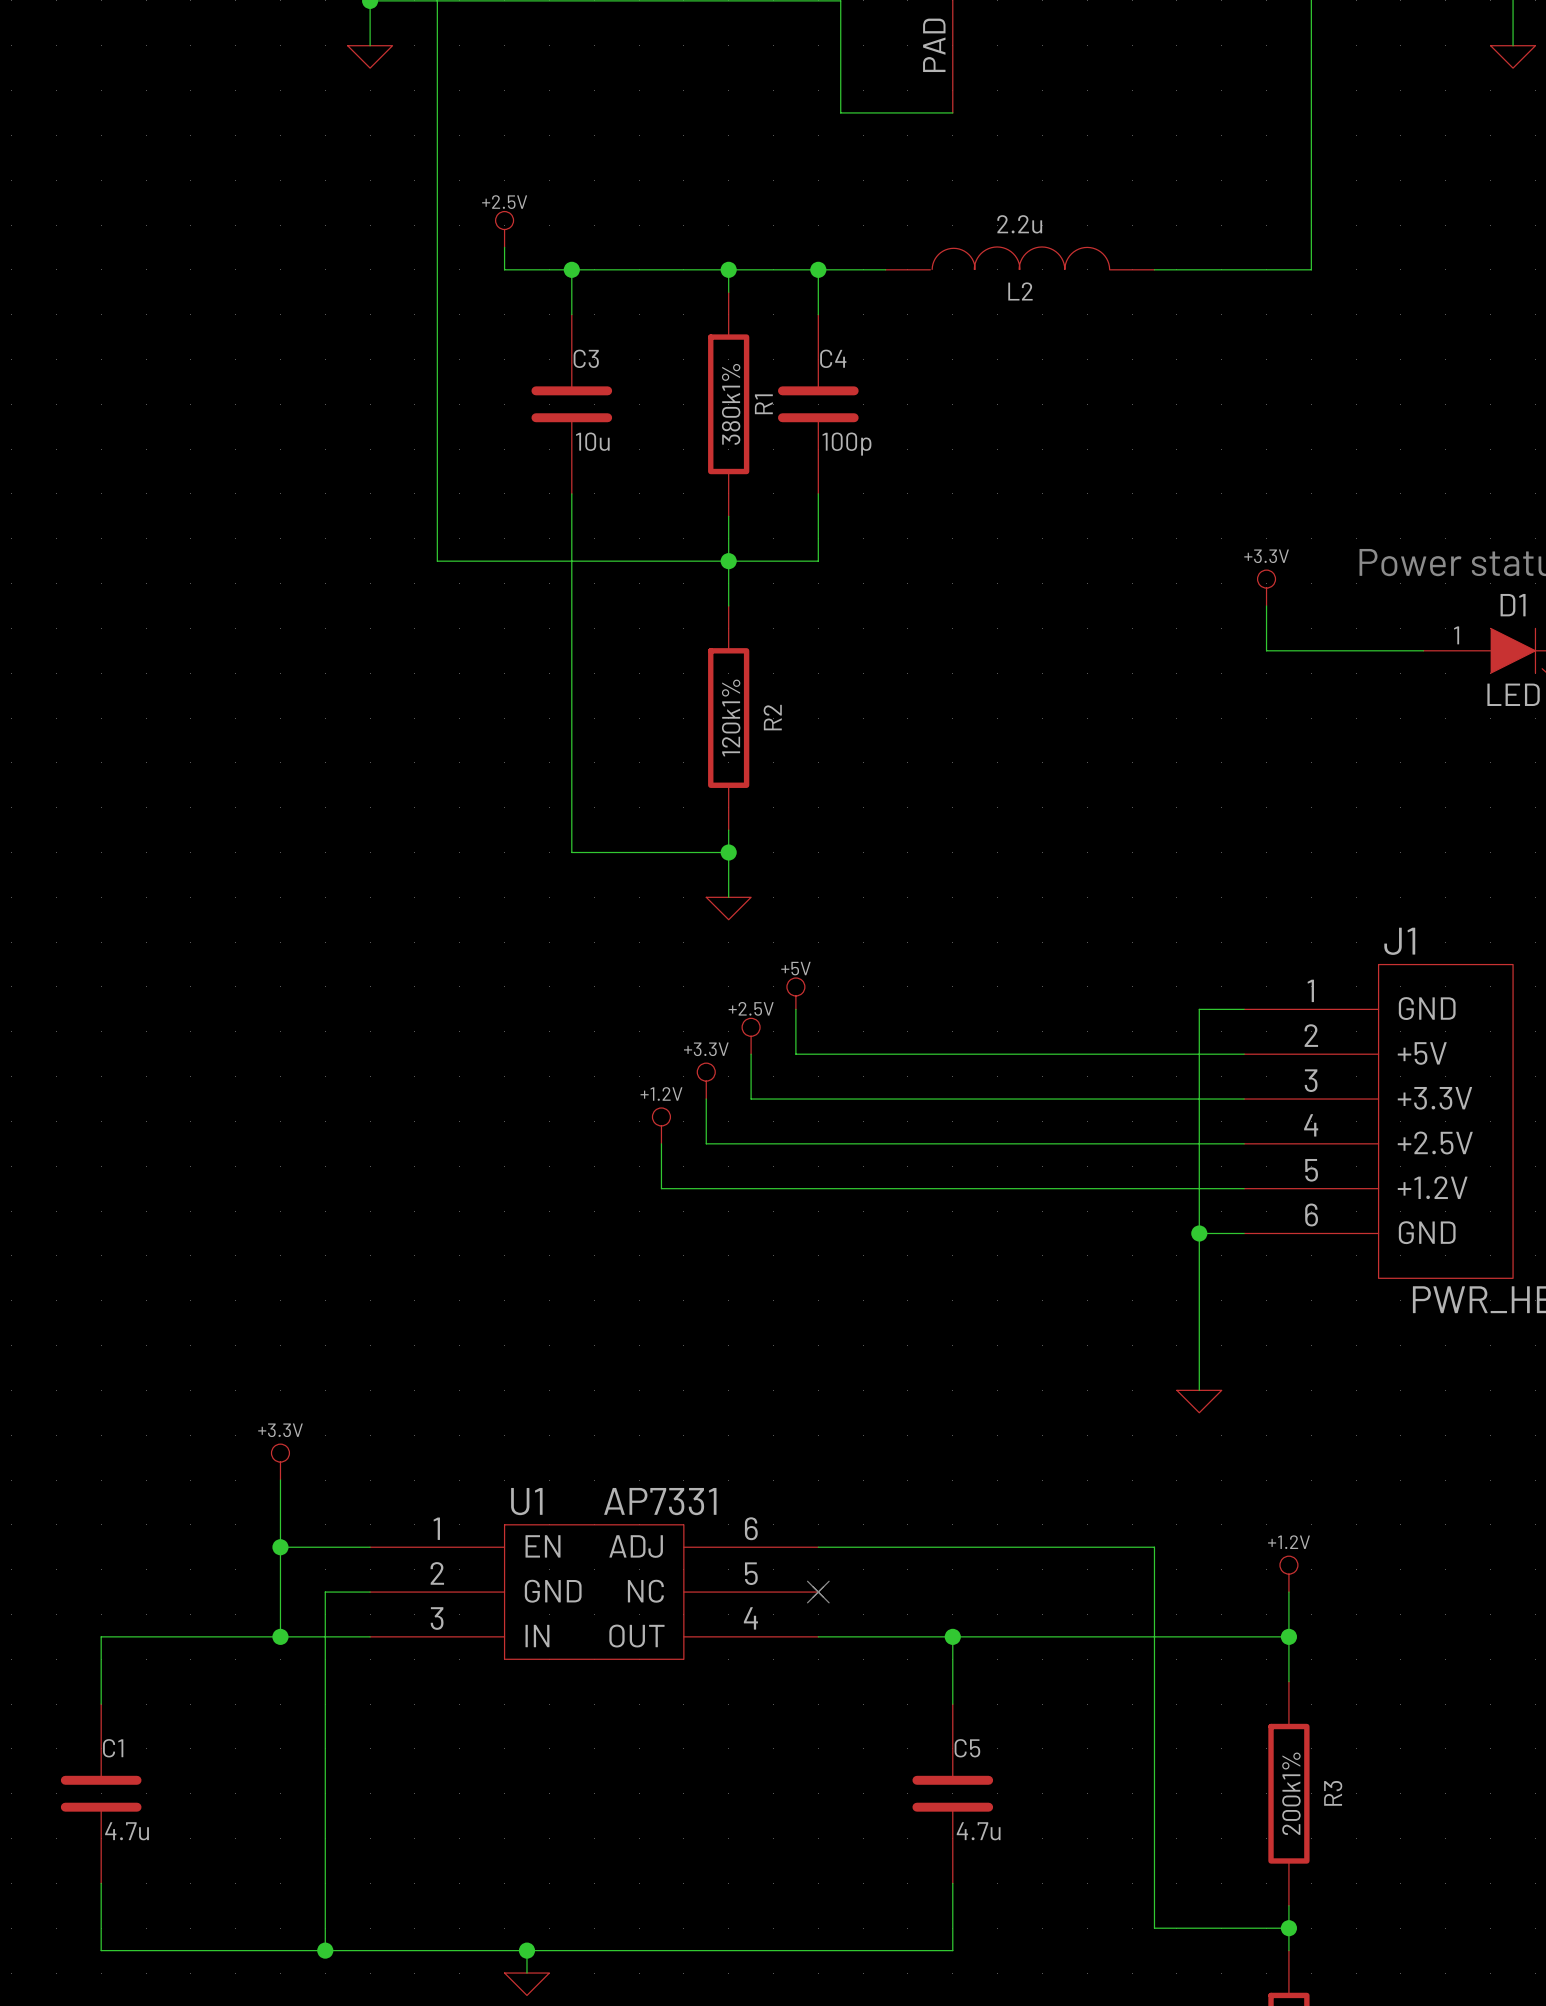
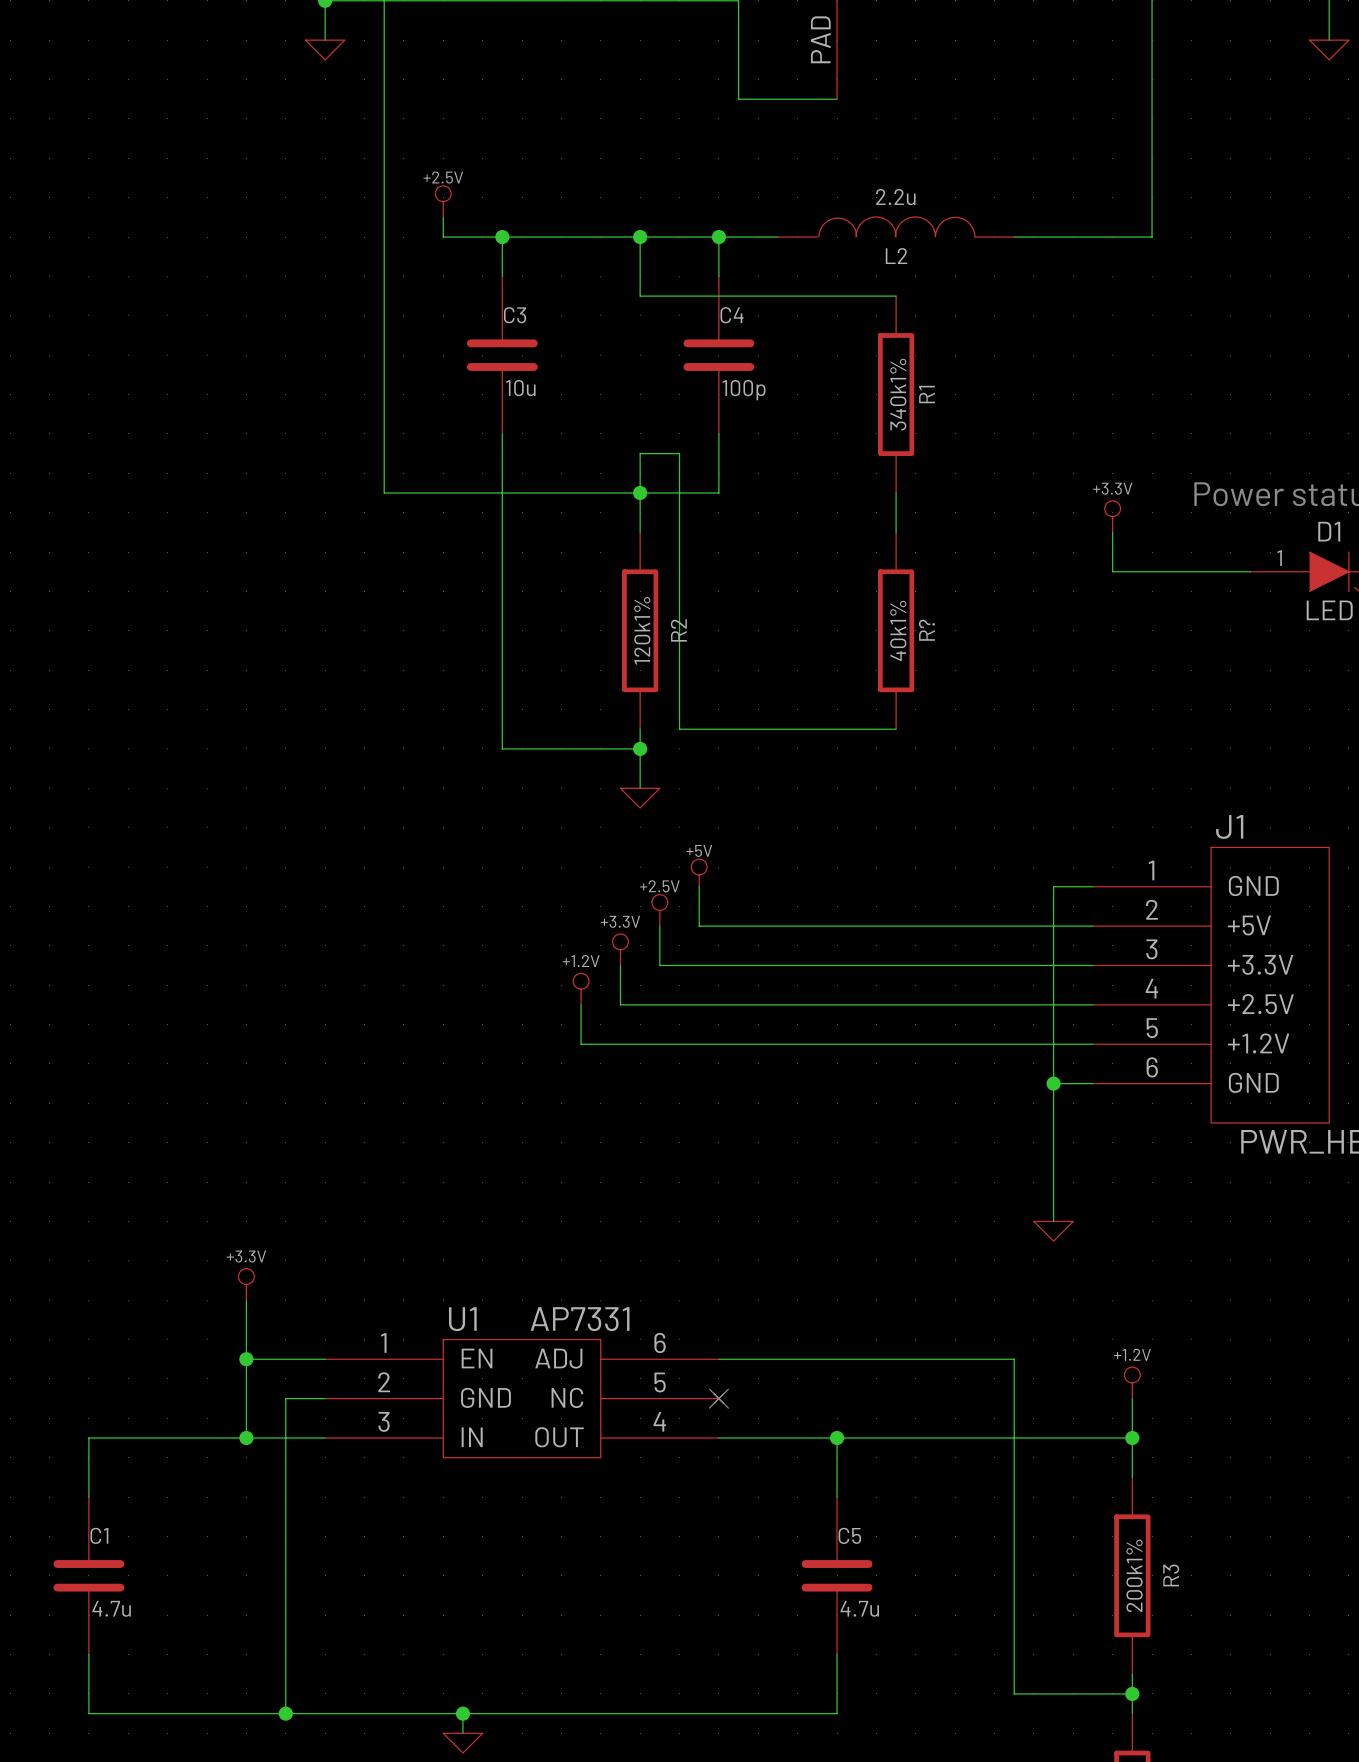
wire: none -> (640, 256) (640, 296) (896, 296)
R1 position: (728, 404) -> (896, 394)
R1 value: 380k1% (731, 404) -> 340k1% (898, 394)
wire: none -> (640, 453) (679, 453) (679, 729) (896, 729)
wire: none -> (896, 492) (896, 532)
R?: none -> 40k1% (896, 630)

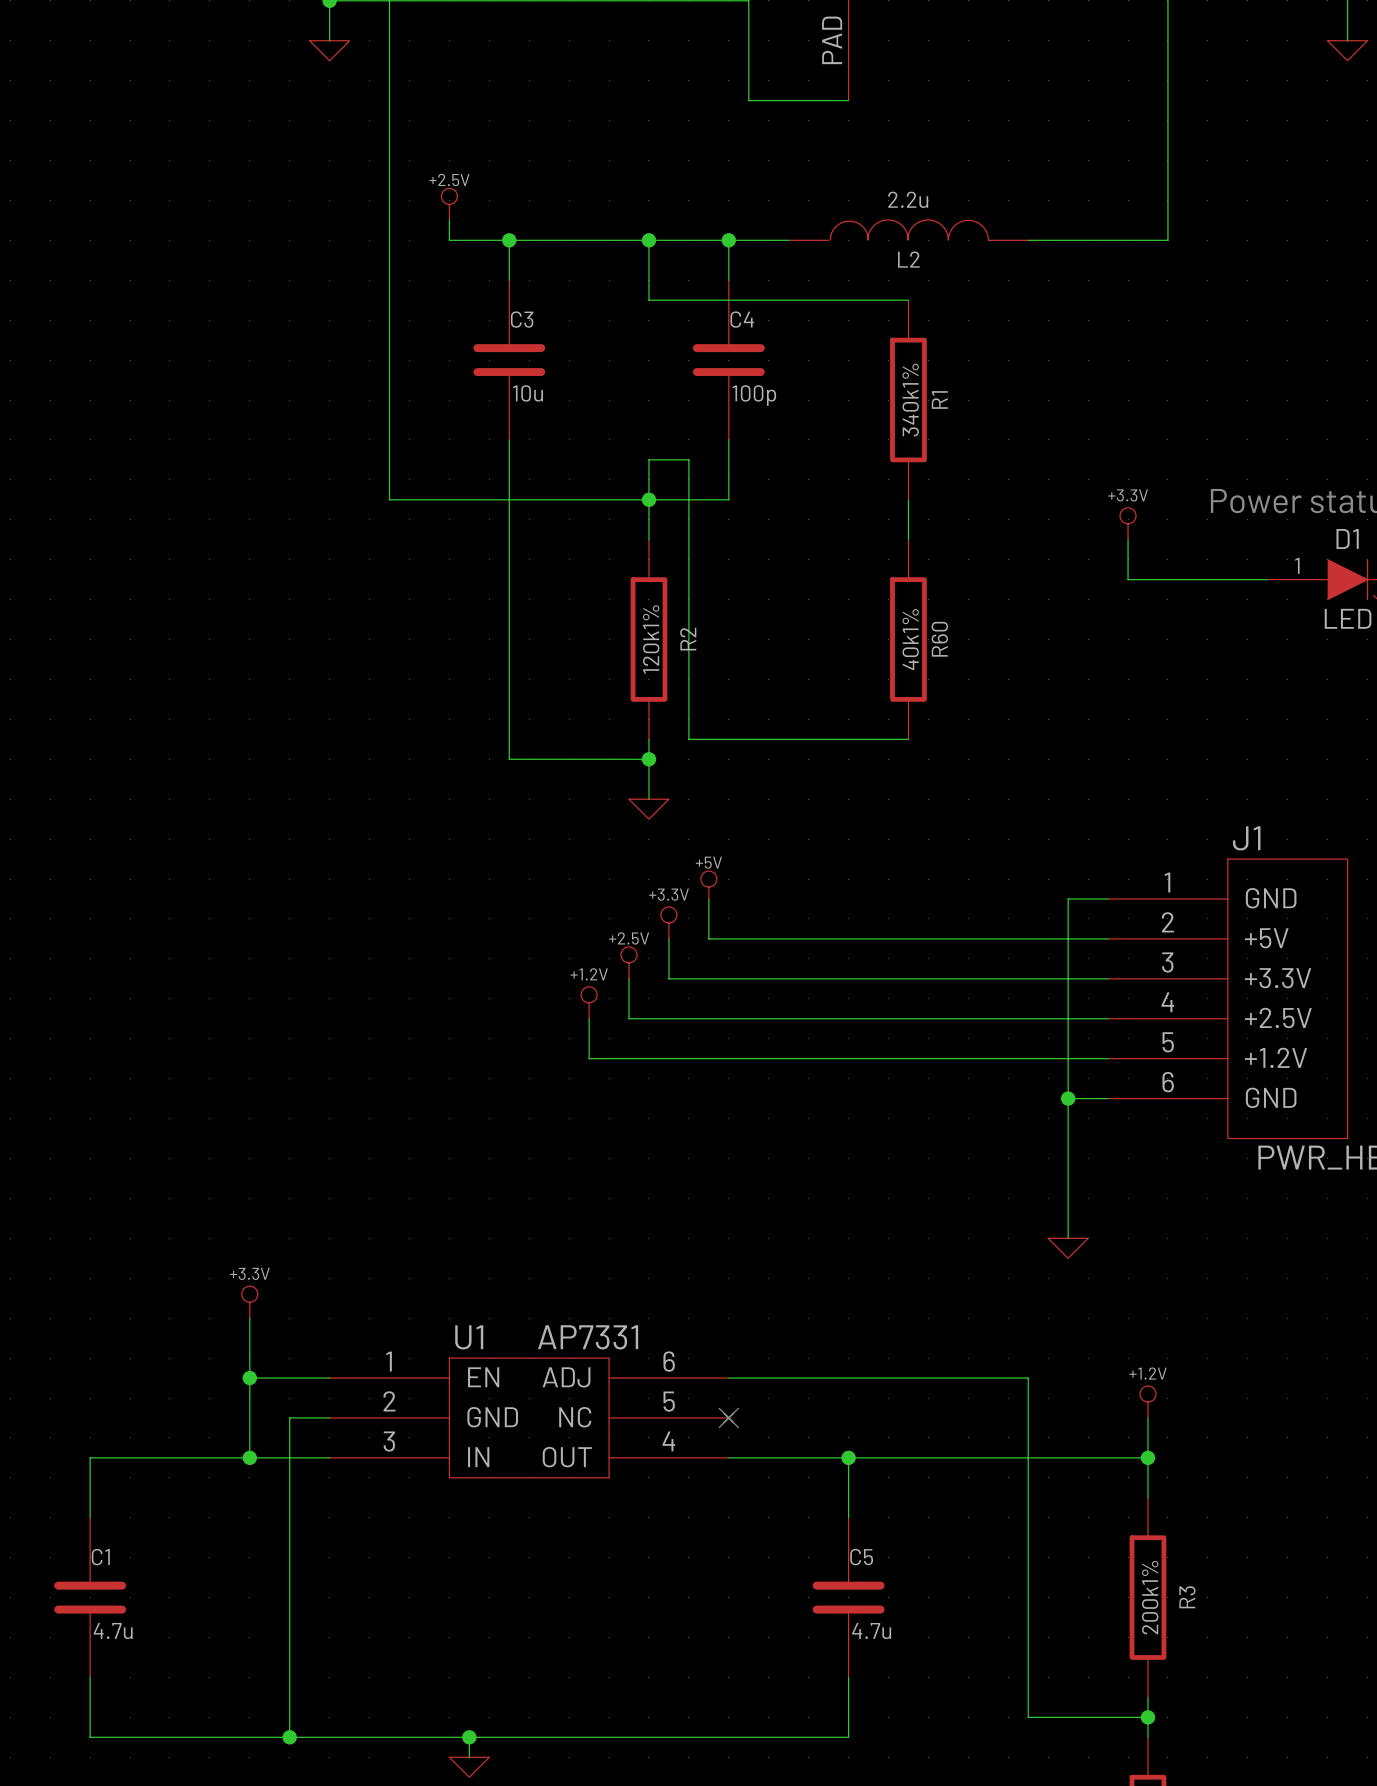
R? name: R? (926, 630) -> R60 (939, 639)
power symbol: +2.5V (659, 910) -> +3.3V (668, 922)
power symbol: +3.3V (620, 949) -> +2.5V (629, 962)

